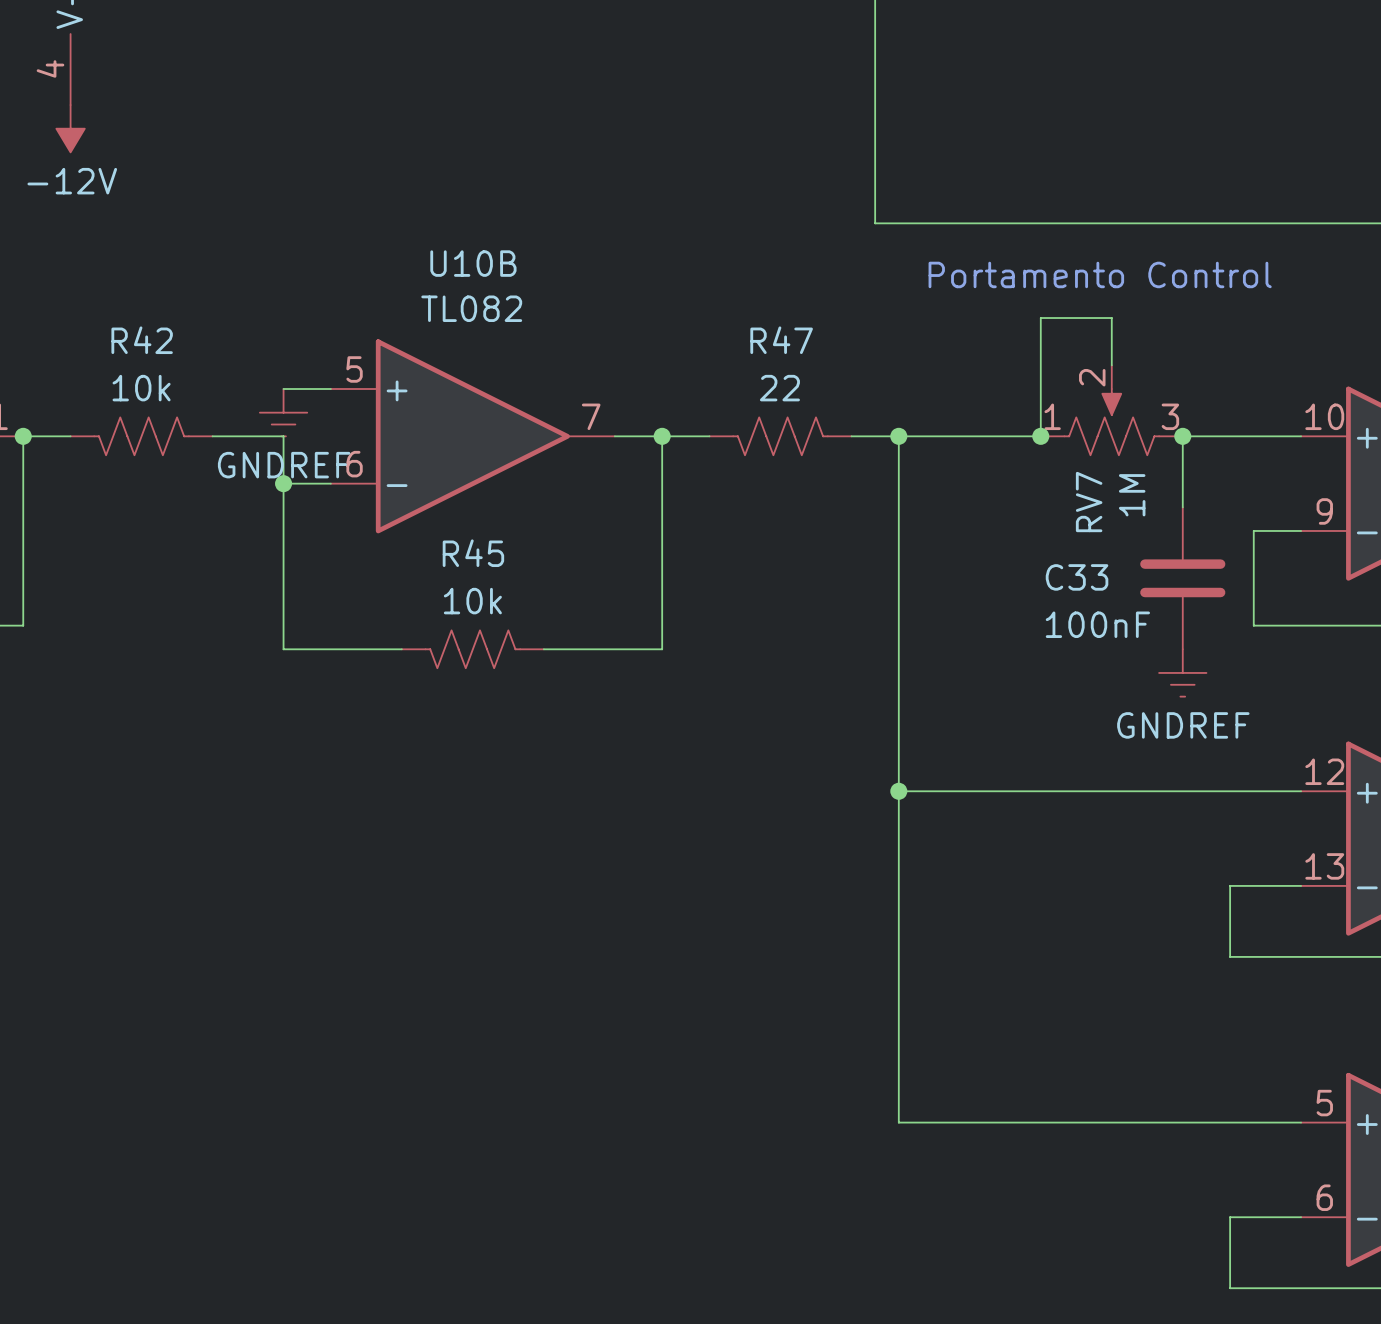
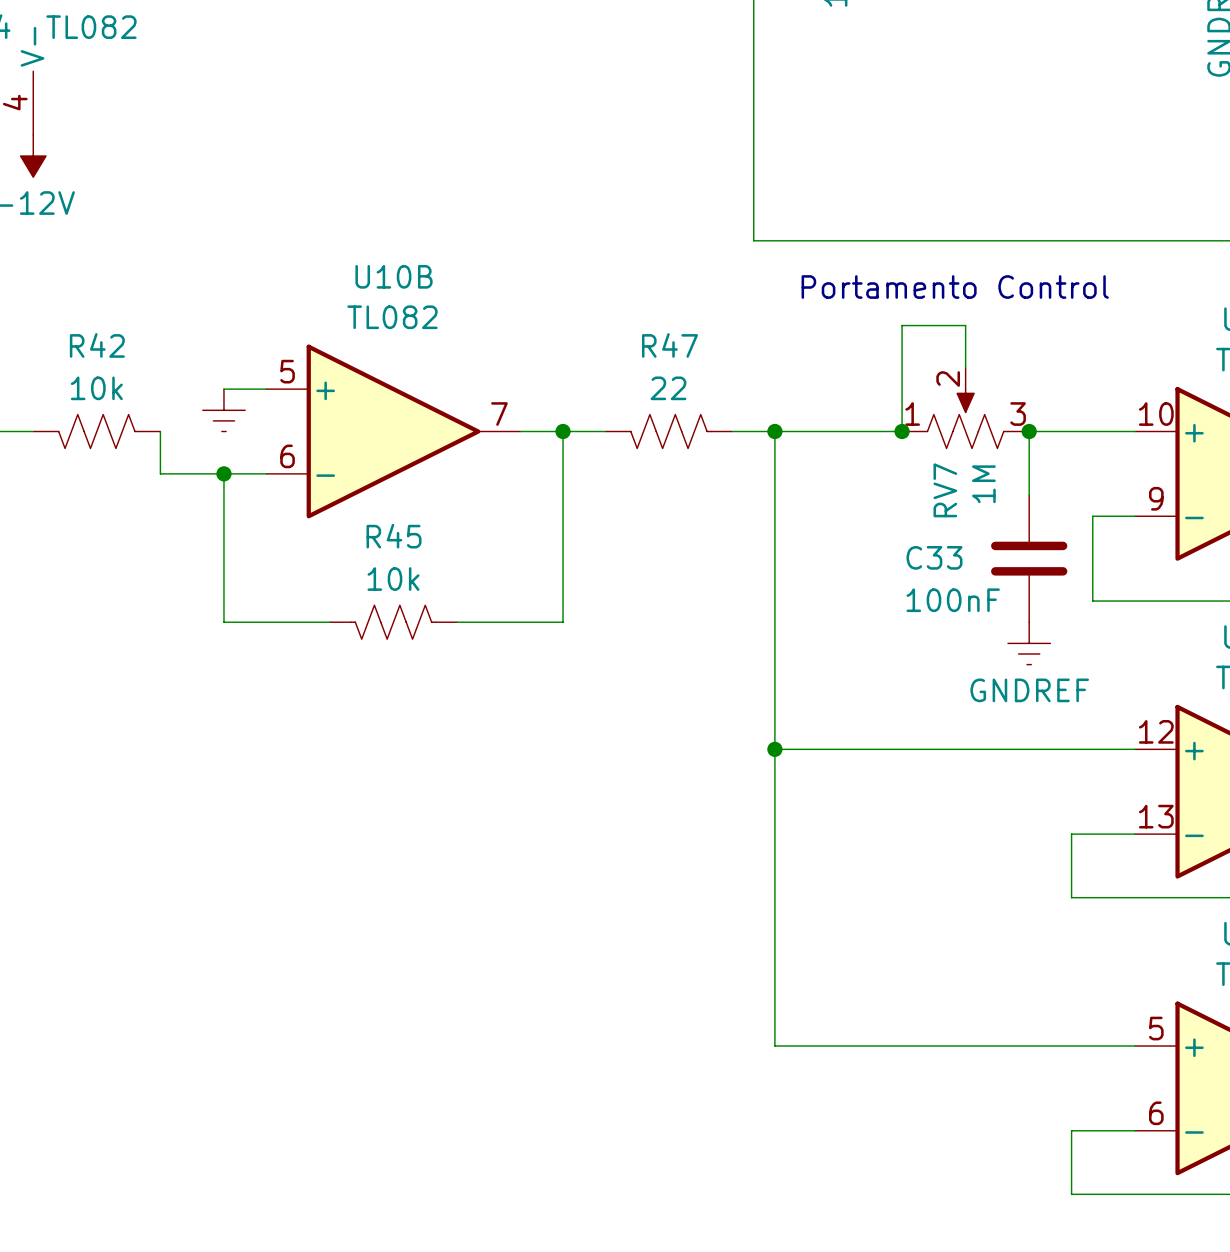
wire: (212, 436) (283, 436) (283, 483) -> (160, 431) (160, 473) (223, 473)
power symbol text: GNDREF (284, 465) -> none

